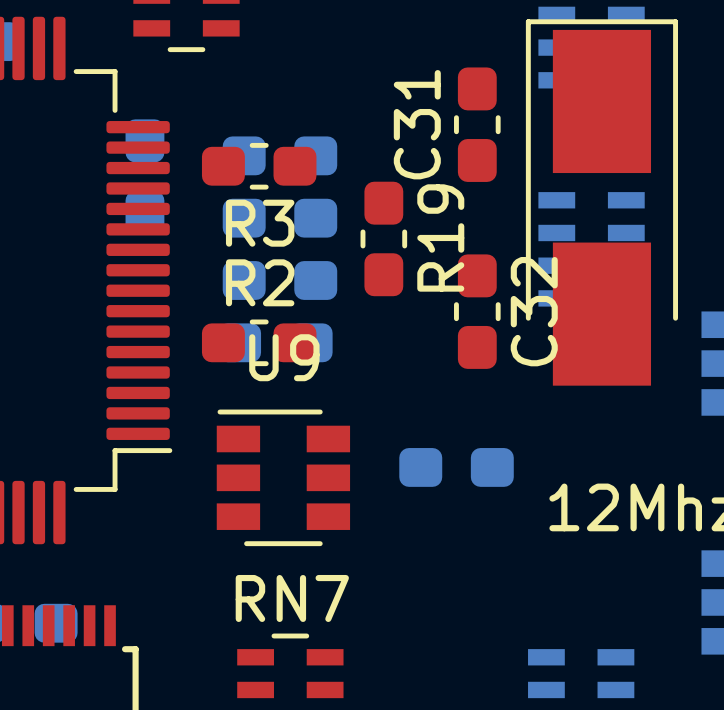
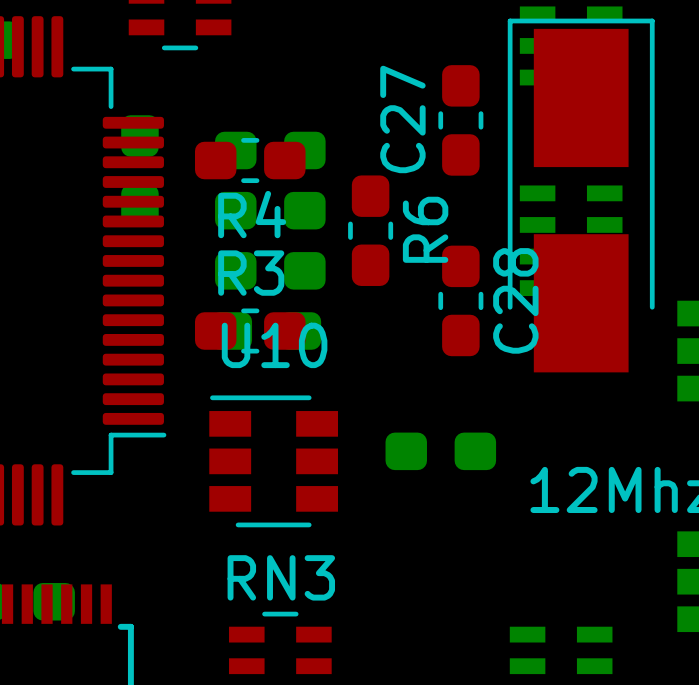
C31 name: C31 (417, 124) -> C27 (402, 119)
R3 name: R3 (260, 223) -> R4 (252, 214)
R19 name: R19 (440, 237) -> R6 (425, 229)
R2 name: R2 (260, 282) -> R3 (251, 273)
C32 name: C32 (534, 311) -> C28 (515, 300)
U9 name: U9 (284, 357) -> U10 (274, 345)
RN7 name: RN7 (292, 598) -> RN3 (281, 577)

